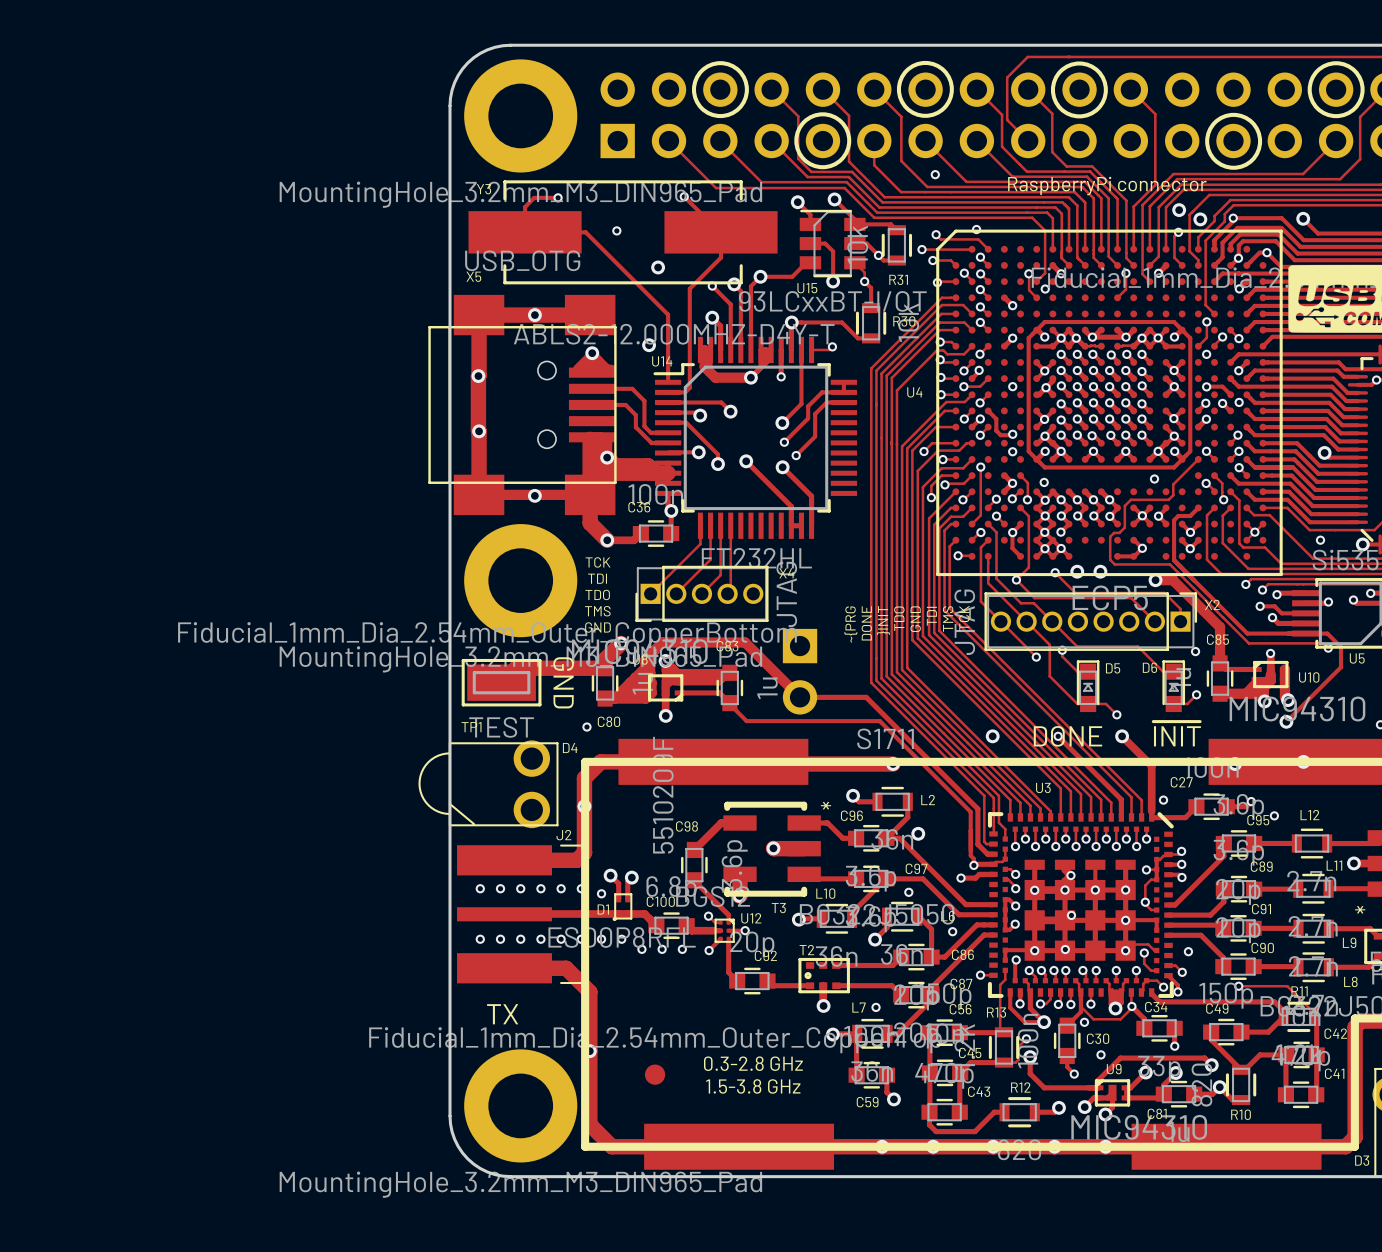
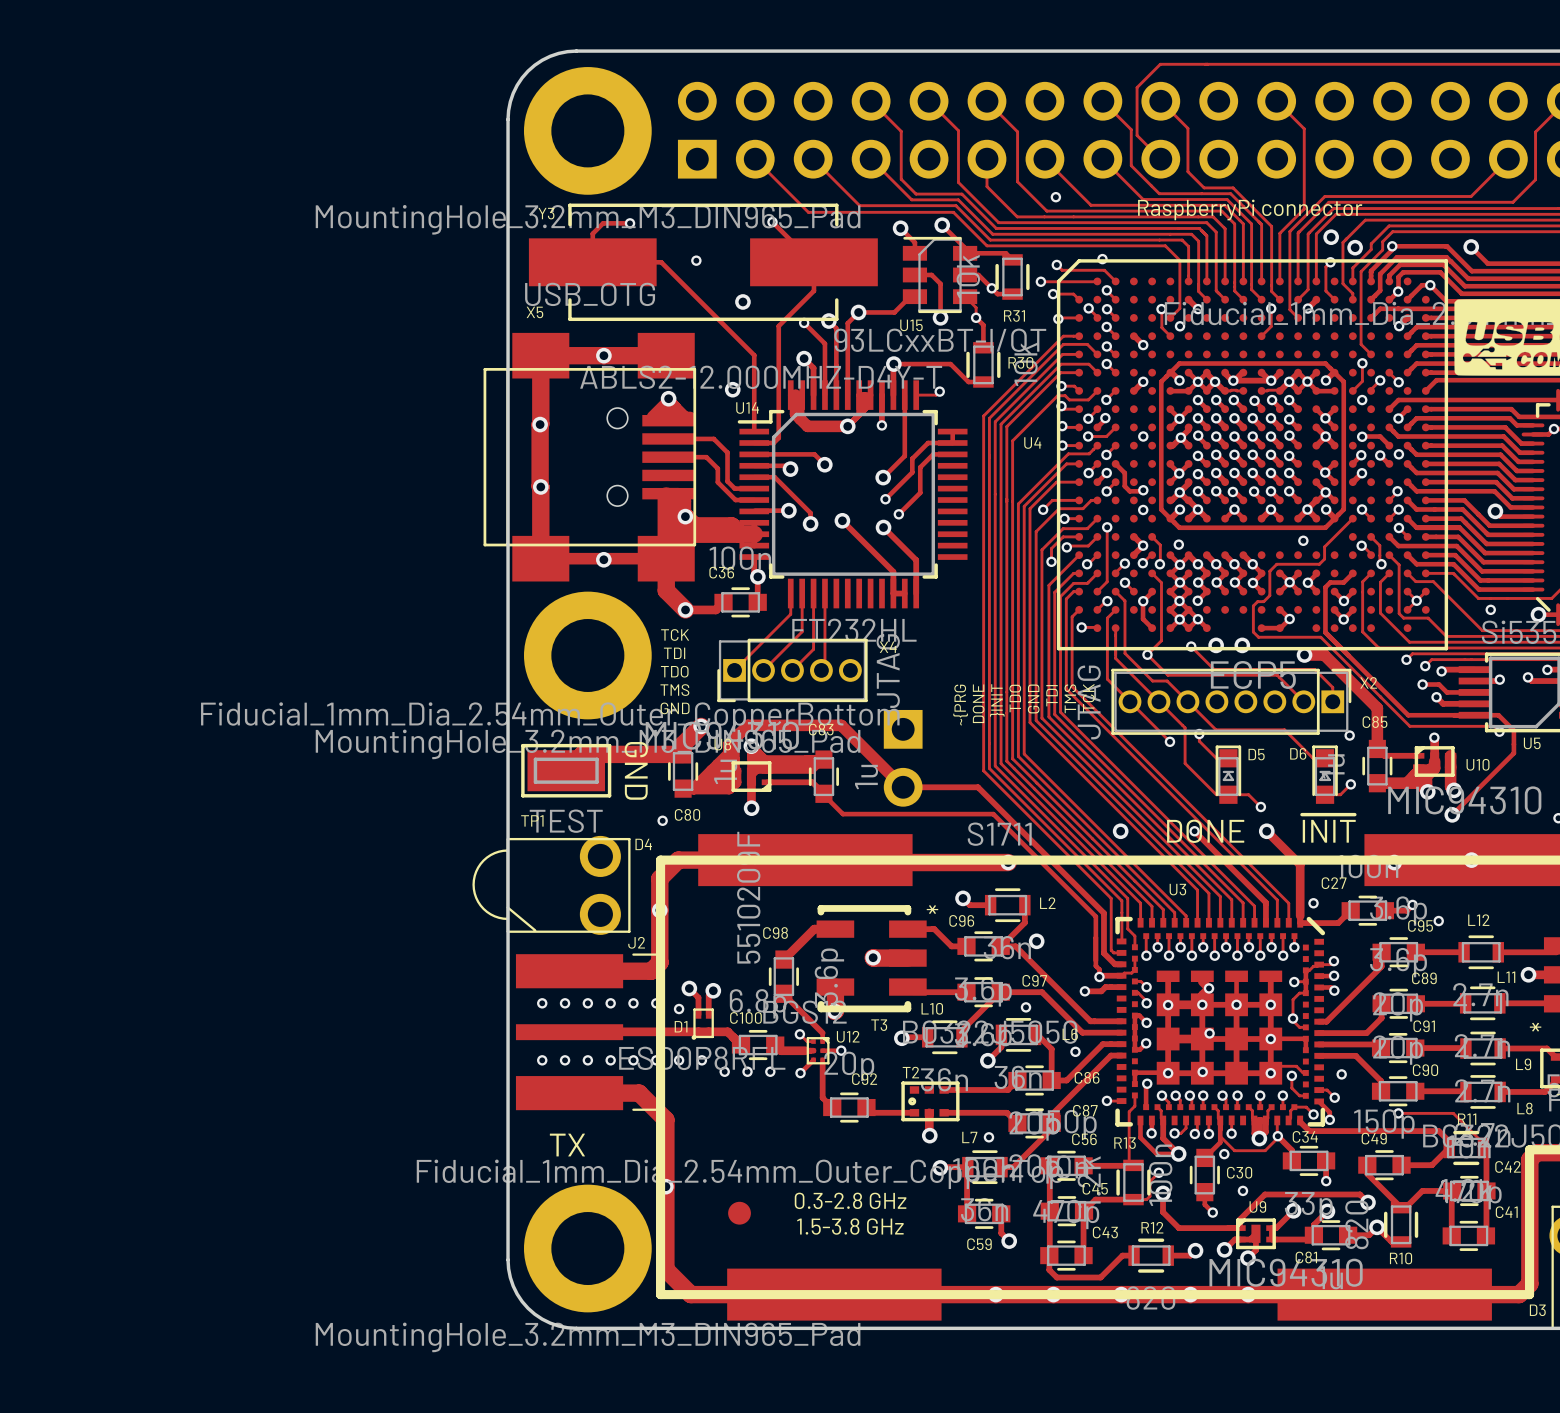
drawing: [896, 60, 954, 118] -> none
drawing: [691, 61, 749, 119] -> none
drawing: [1050, 61, 1108, 119] -> none
drawing: [1307, 61, 1365, 119] -> none
drawing: [794, 112, 852, 170] -> none
drawing: [1205, 112, 1263, 170] -> none

